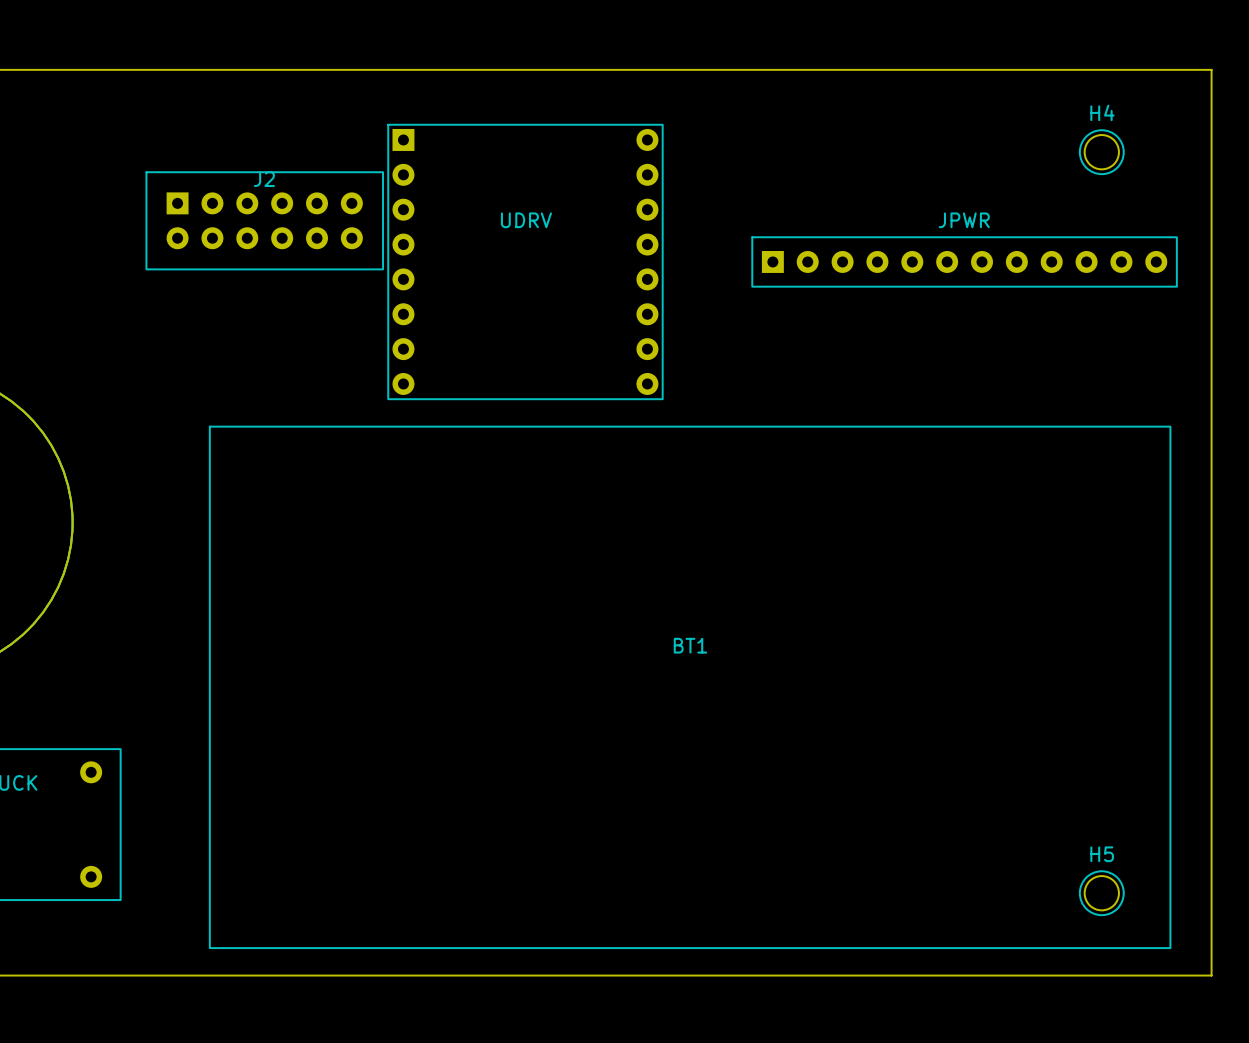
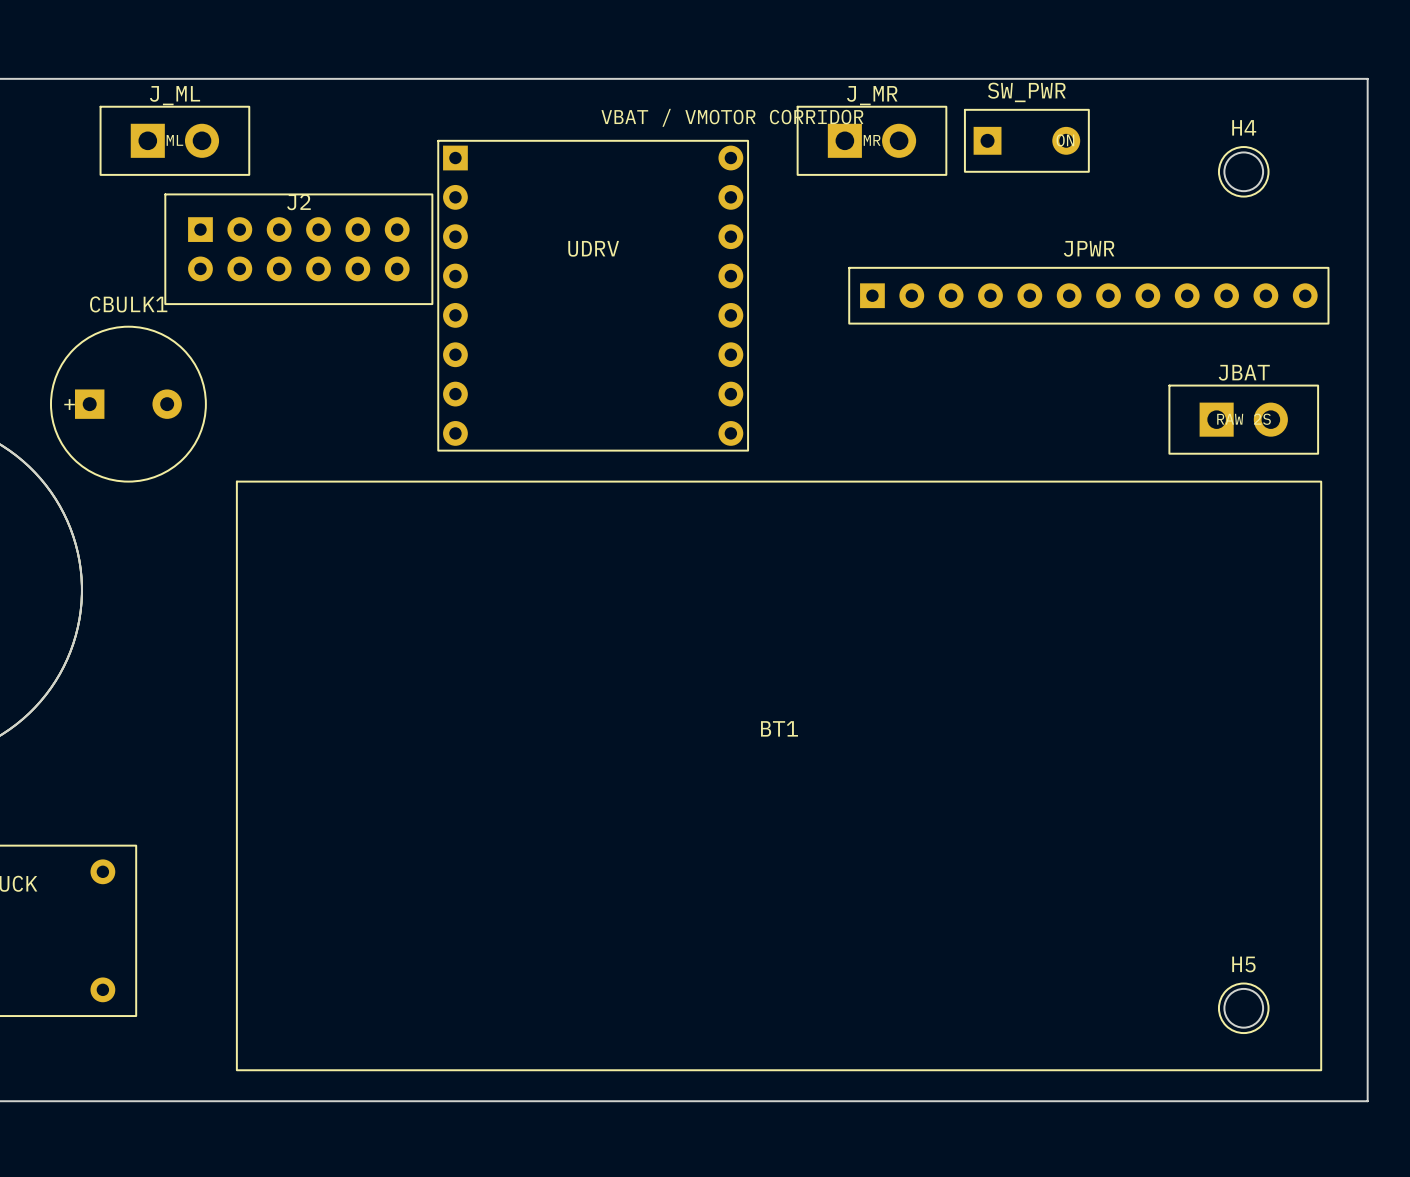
text: none -> VBAT / VMOTOR CORRIDOR (732, 117)
J_ML: none -> (174, 140)
J_MR: none -> (871, 140)
SW_PWR: none -> (1026, 140)
CBULK1: none -> (128, 404)
JBAT: none -> (1243, 419)

